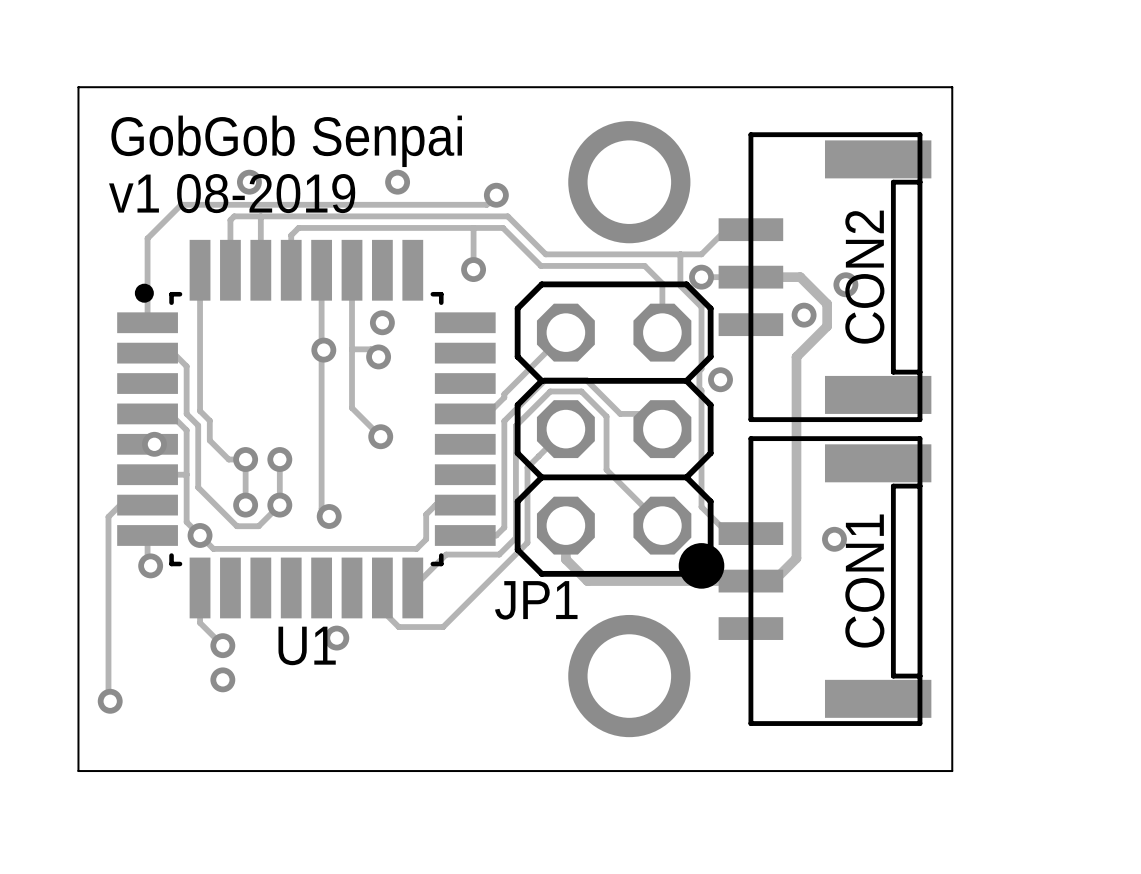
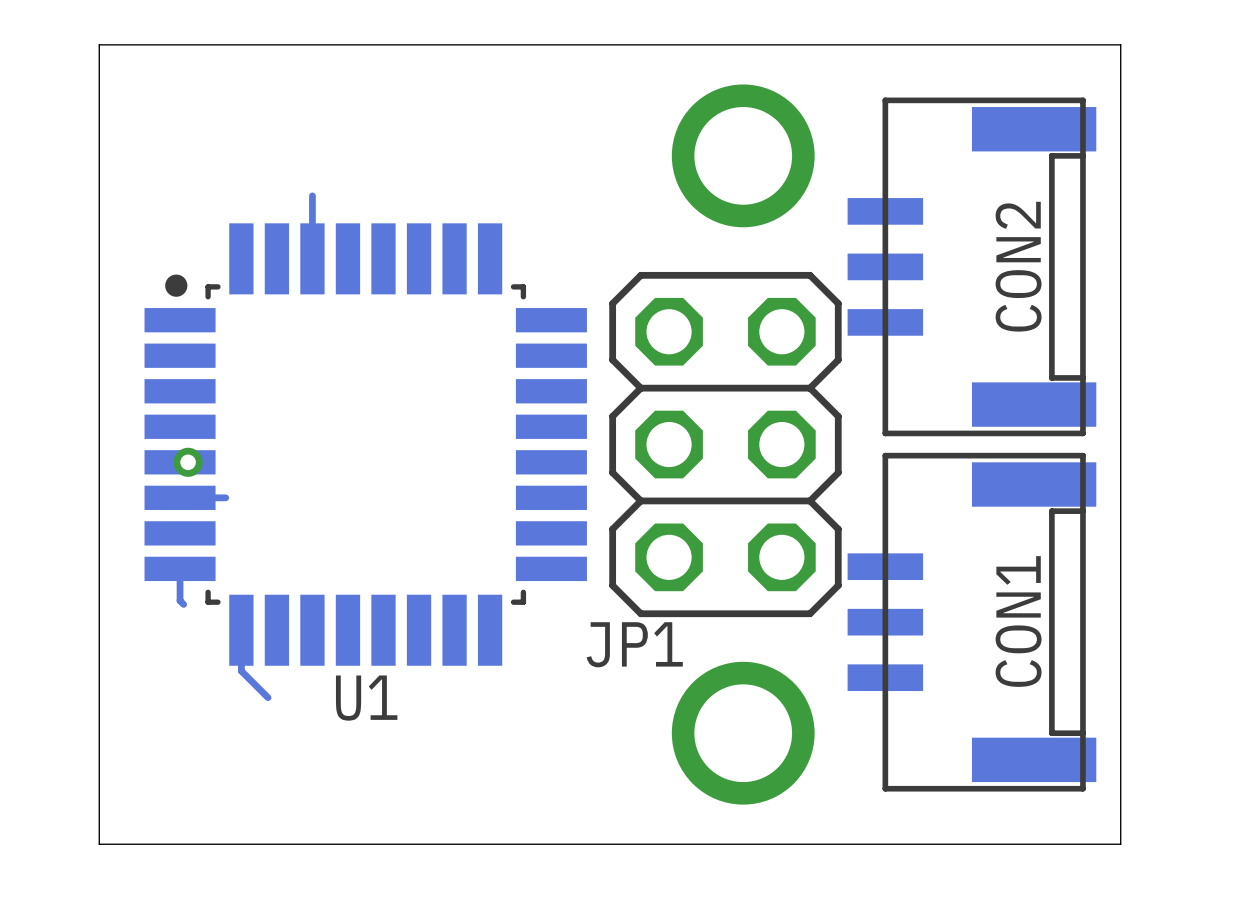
text: GobGob Senpai (286, 141) -> none
via: (249, 182) -> none
via: (397, 182) -> none
text: v1 08-2019 (232, 193) -> none
track: (496, 195) (486, 204) (181, 204) (147, 238) (147, 322) -> none
via: (496, 195) -> none
track: (473, 227) (473, 269) -> none
track: (750, 229) (726, 229) (701, 254) (545, 254) (507, 216) (234, 216) (230, 220) (230, 270) -> none
track: (680, 254) (680, 285) (701, 307) (701, 368) (699, 370) (699, 388) (701, 390) (701, 507) (728, 533) (750, 533) -> none
via: (473, 269) -> none
track: (200, 270) (200, 410) (209, 420) (209, 440) (228, 459) (245, 459) (245, 505) -> none
track: (291, 270) (291, 235) (298, 227) (502, 227) (540, 265) (644, 265) (662, 283) (662, 332) -> none
track: (321, 270) (321, 508) (329, 516) -> none
track: (352, 270) (352, 407) (380, 436) -> none
track: (701, 277) (800, 277) (827, 304) (827, 326) (796, 356) (796, 558) (773, 581) (587, 581) (565, 559) (565, 525) -> none
via: (701, 277) -> none
via: (845, 284) -> none
via: (804, 315) -> none
via: (382, 322) -> none
track: (565, 332) (504, 394) (504, 397) (487, 413) (465, 413) -> none
track: (352, 349) (371, 349) (378, 356) -> none
via: (323, 350) -> none
track: (147, 353) (173, 353) (186, 366) (186, 413) (198, 425) (198, 487) (236, 526) (258, 526) (279, 505) (279, 459) -> none
via: (378, 356) -> none
via: (720, 379) -> none
track: (147, 413) (170, 413) (186, 430) (186, 522) (213, 548) (416, 548) (426, 539) (426, 514) (435, 505) (465, 505) -> none
track: (565, 429) (527, 467) (527, 542) (443, 627) (398, 627) (382, 610) (382, 587) -> none
track: (662, 429) (647, 413) (620, 413) (586, 379) (545, 379) (504, 421) (504, 527) (496, 535) (465, 535) -> none
via: (380, 436) -> none
via: (245, 459) -> none
via: (279, 459) -> none
track: (147, 505) (120, 505) (108, 516) (108, 699) (110, 701) -> none
via: (245, 505) -> none
via: (279, 505) -> none
via: (329, 516) -> none
track: (662, 525) (606, 469) (606, 416) (581, 391) (550, 391) (515, 425) (515, 537) (499, 554) (446, 554) (412, 587) -> none
via: (200, 535) -> none
via: (834, 539) -> none
drawing: [678, 543, 725, 589] -> none
via: (150, 565) -> none
via: (336, 638) -> none
via: (222, 645) -> none
via: (222, 679) -> none
via: (110, 701) -> none

